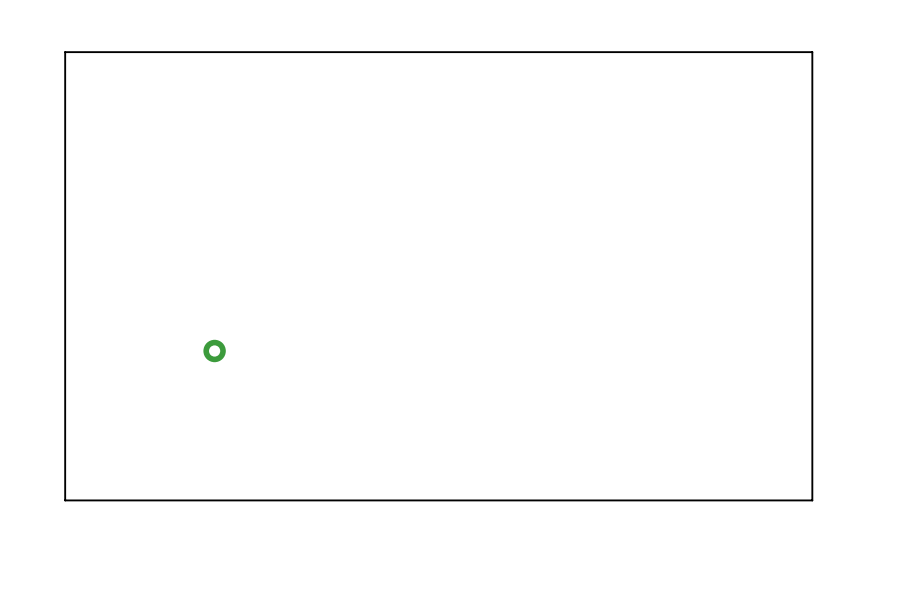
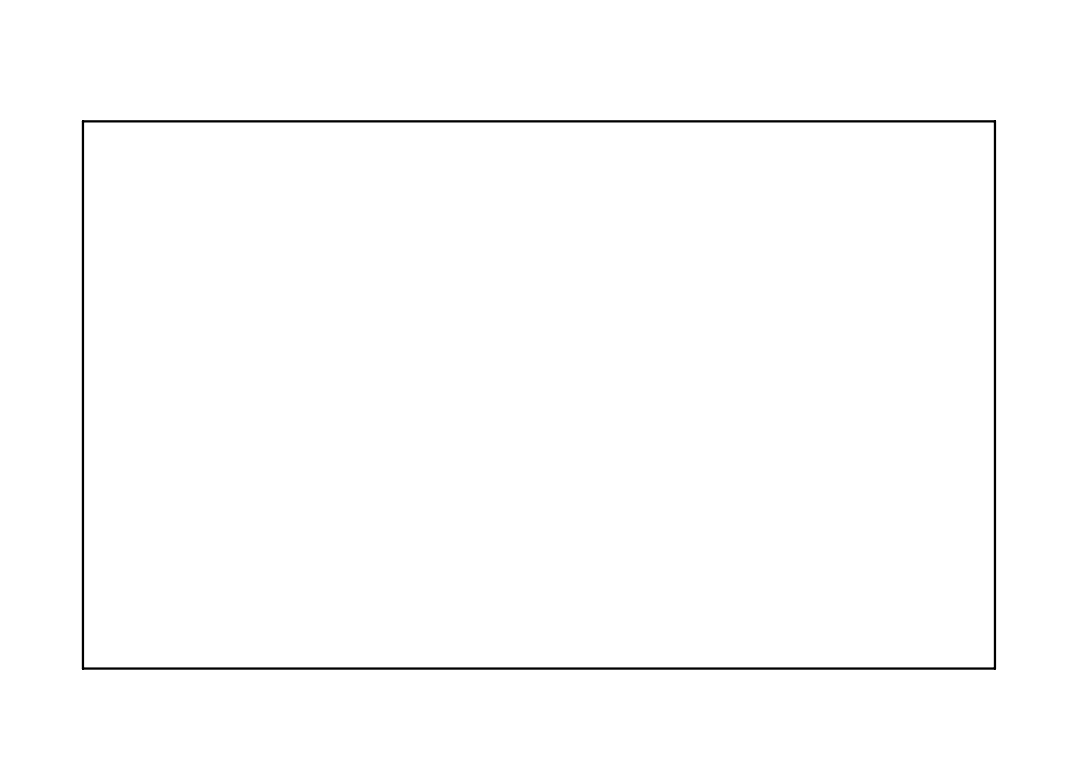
via: (214, 350) -> none

